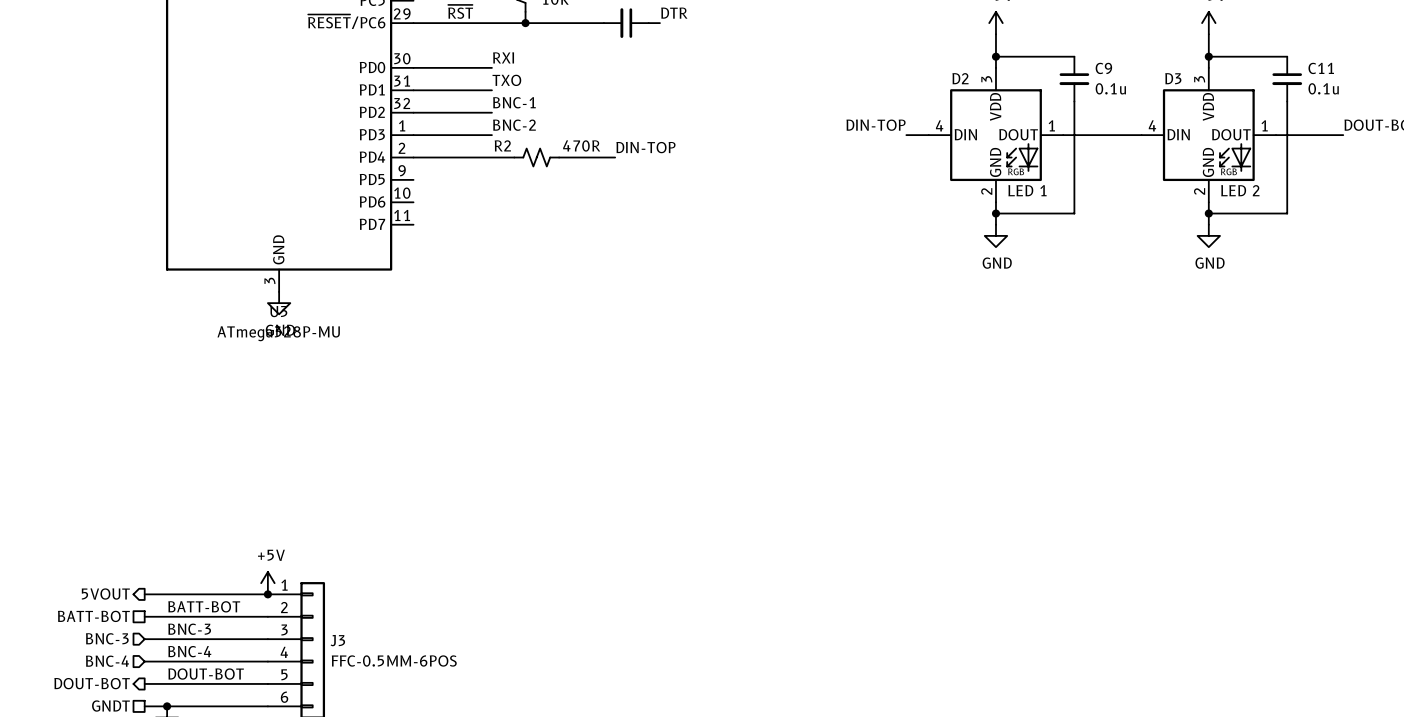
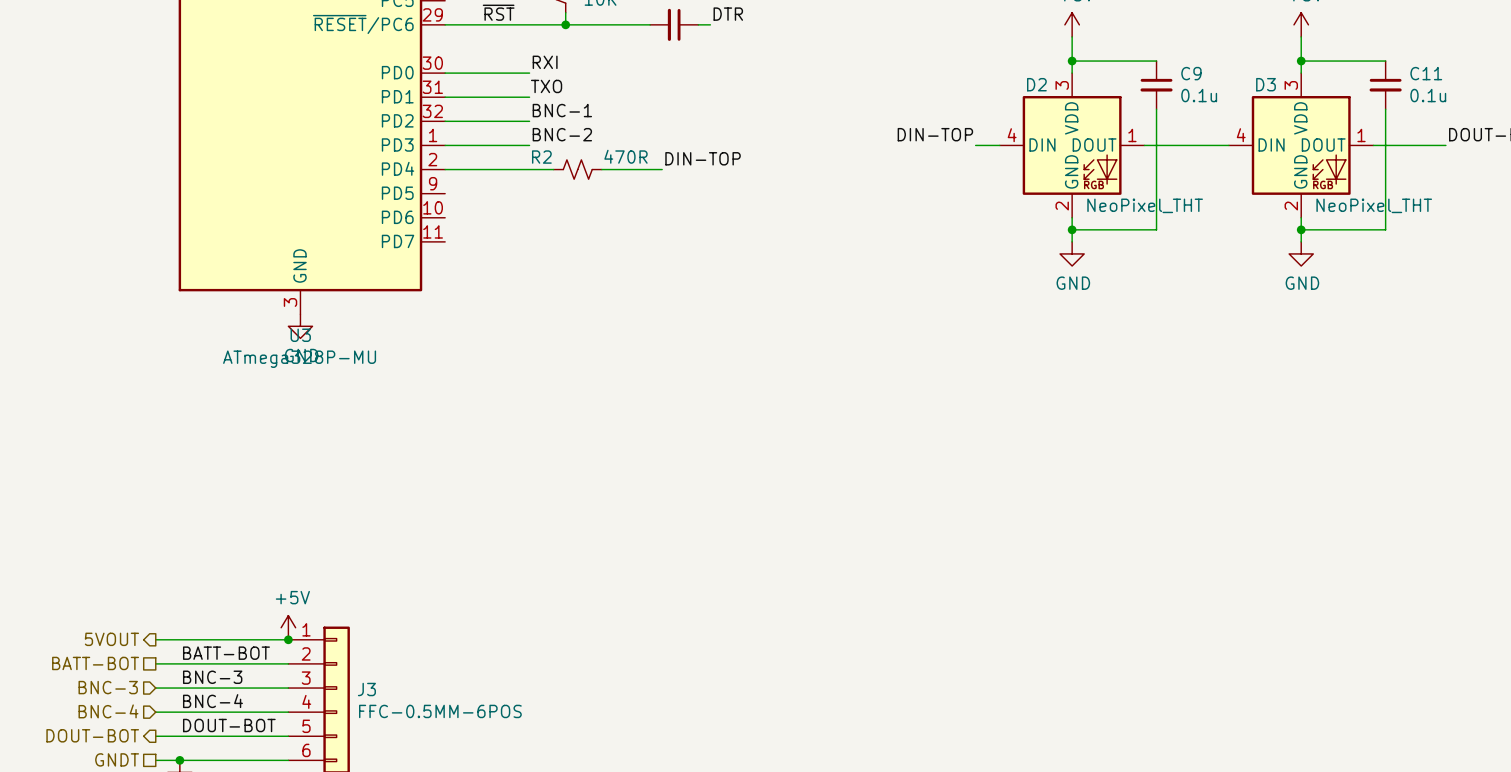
D2 value: LED 1 (1027, 190) -> NeoPixel_THT (1145, 205)
D3 value: LED 2 (1240, 190) -> NeoPixel_THT (1374, 205)

